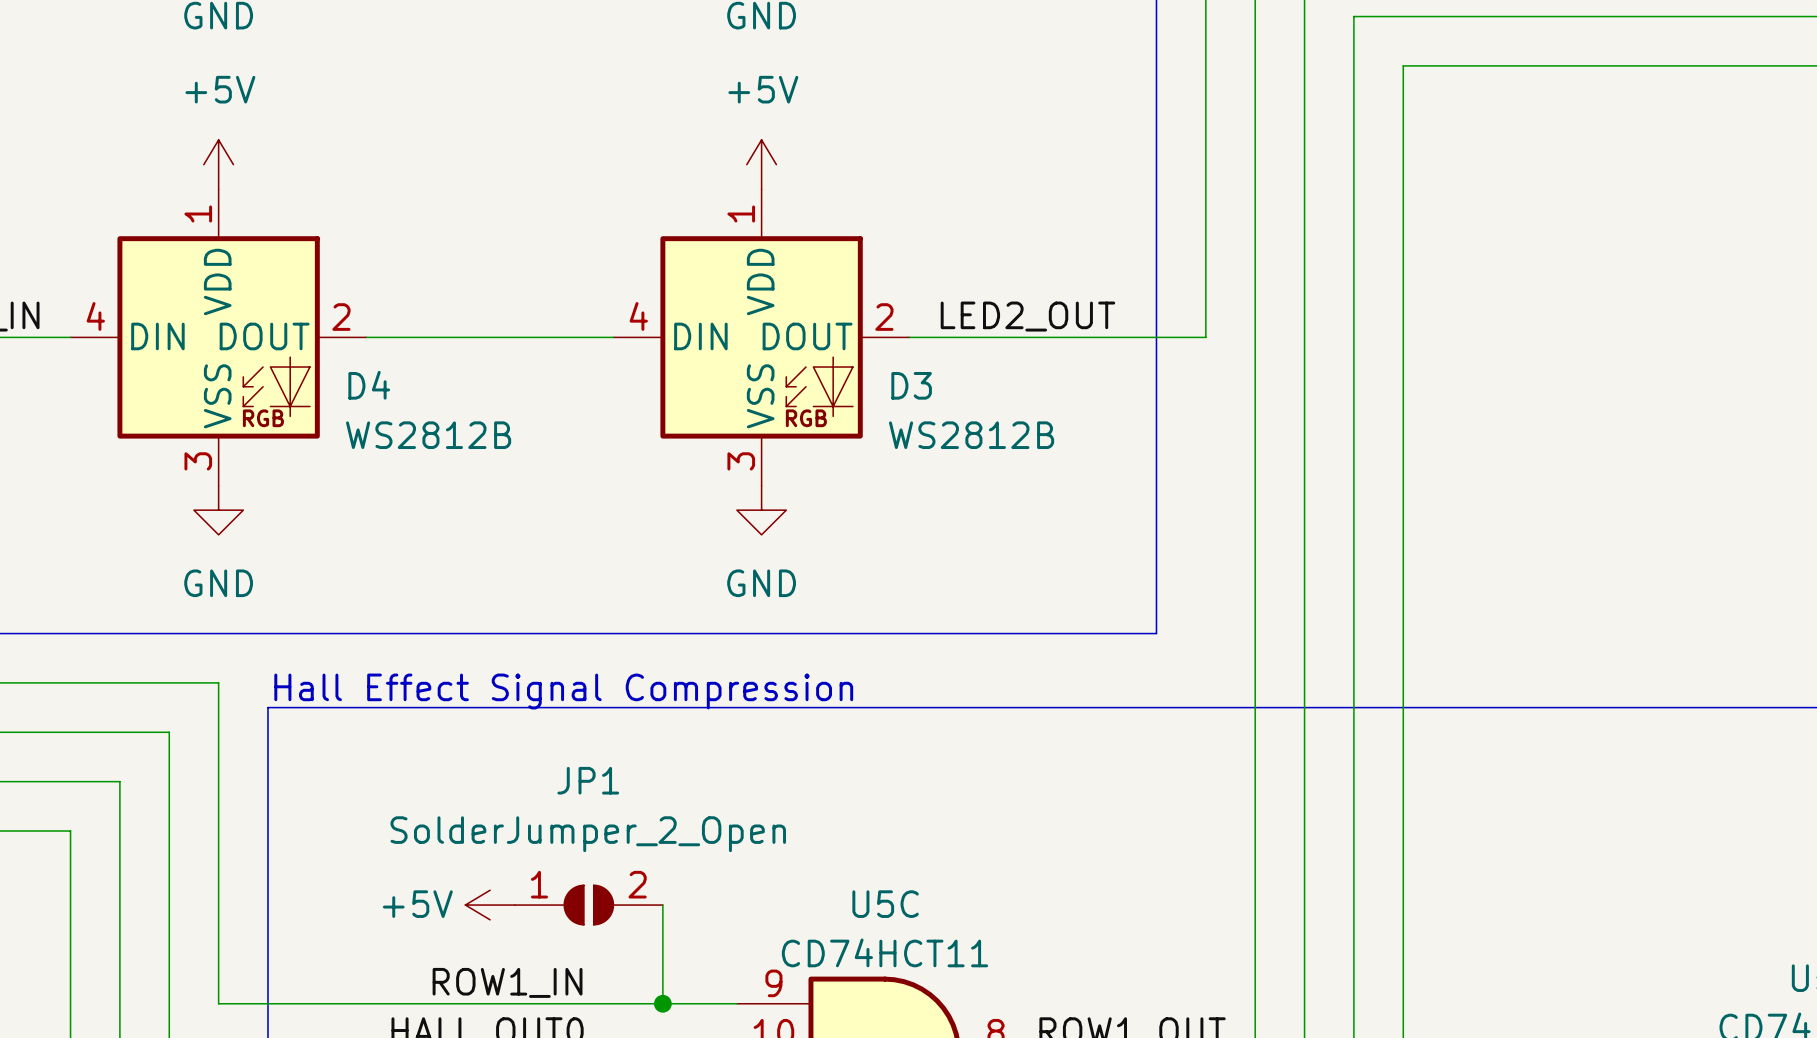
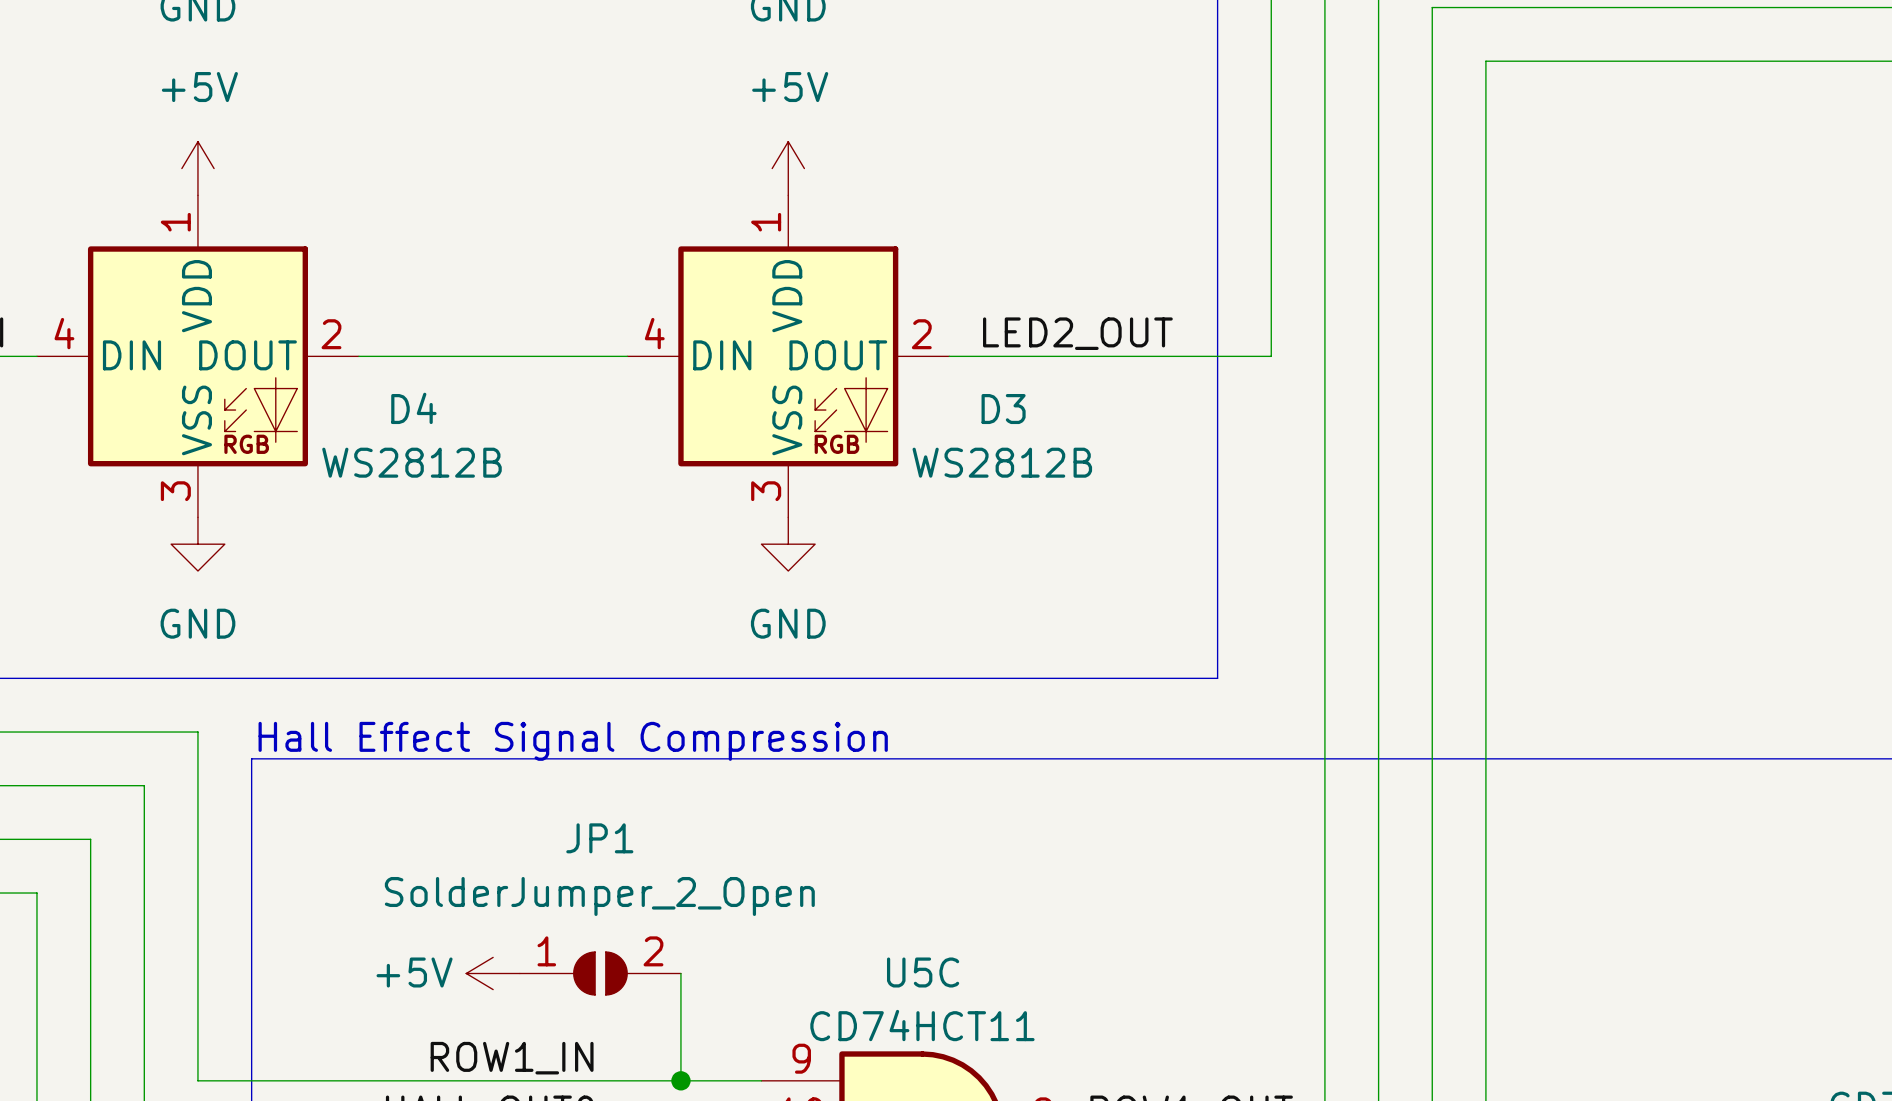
D4 name position: D4 (369, 385) -> D4 (413, 408)
D3 name position: D3 (911, 385) -> D3 (1003, 409)
D4 value position: WS2812B (428, 435) -> WS2812B (411, 462)
D3 value position: WS2812B (971, 435) -> WS2812B (1002, 462)

